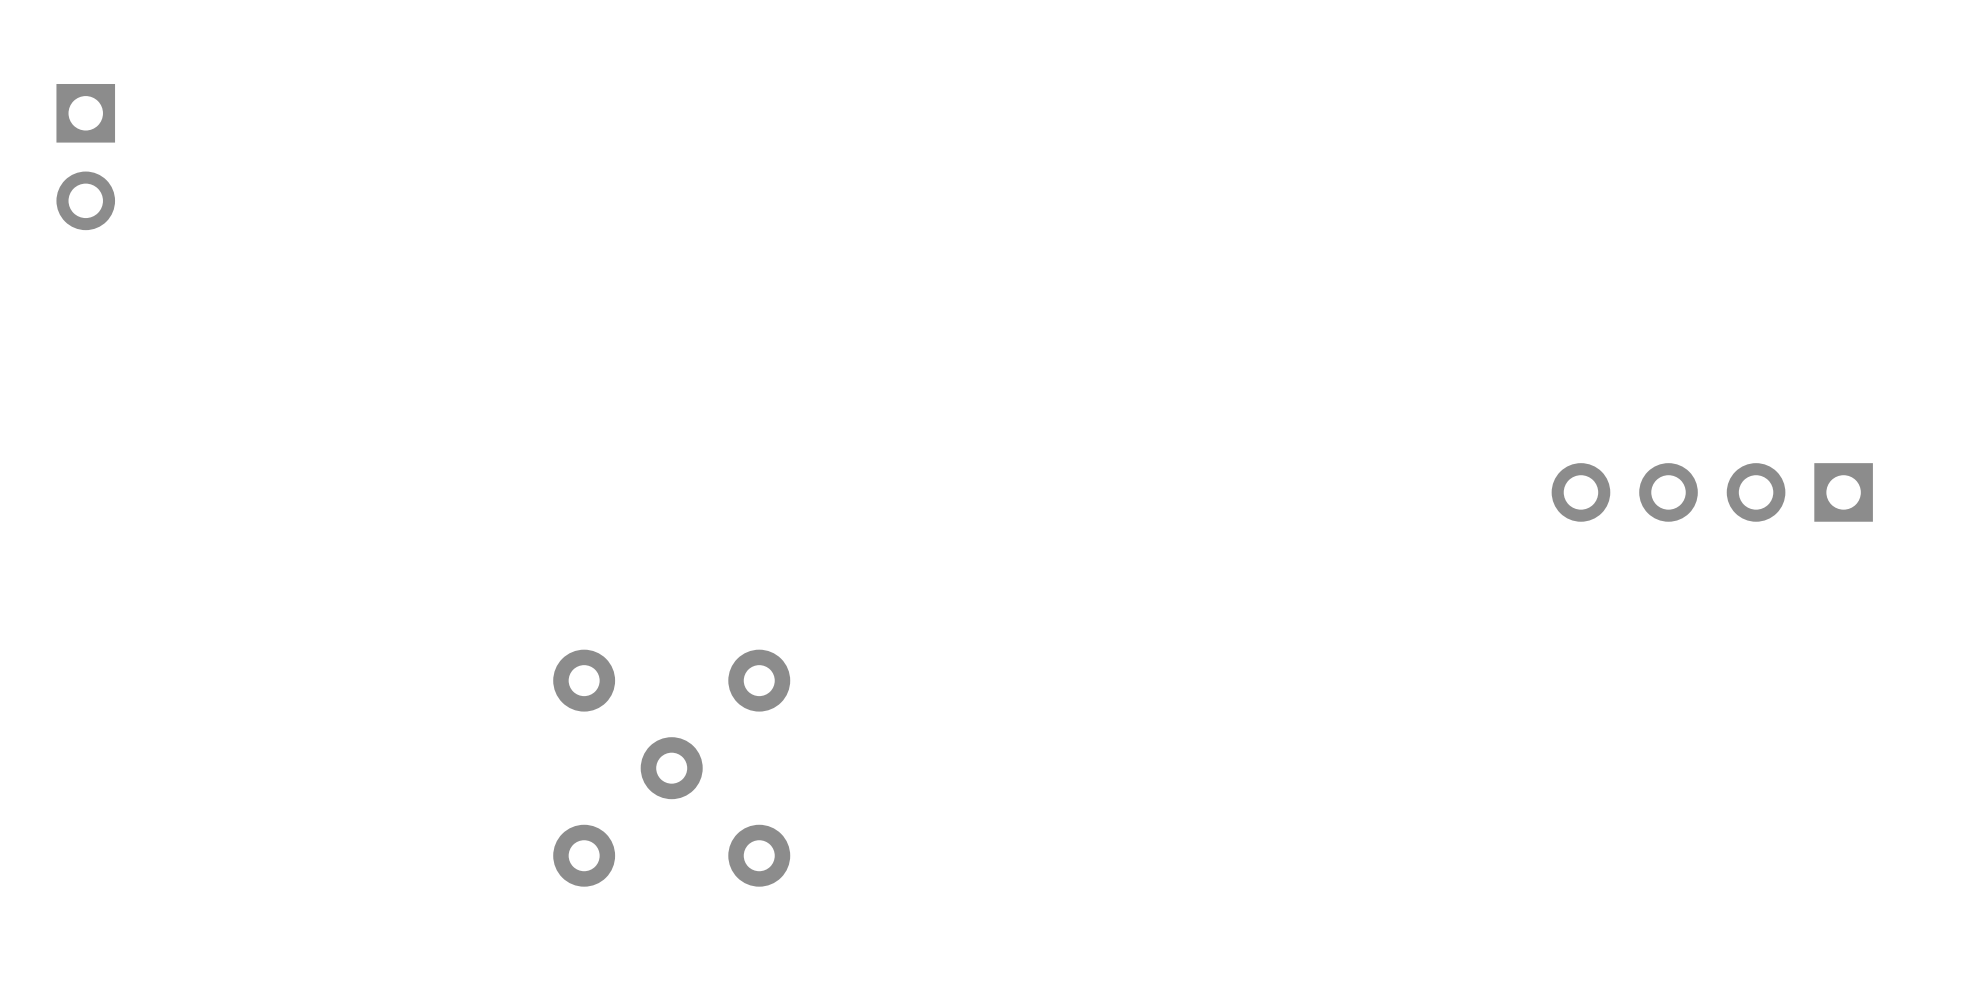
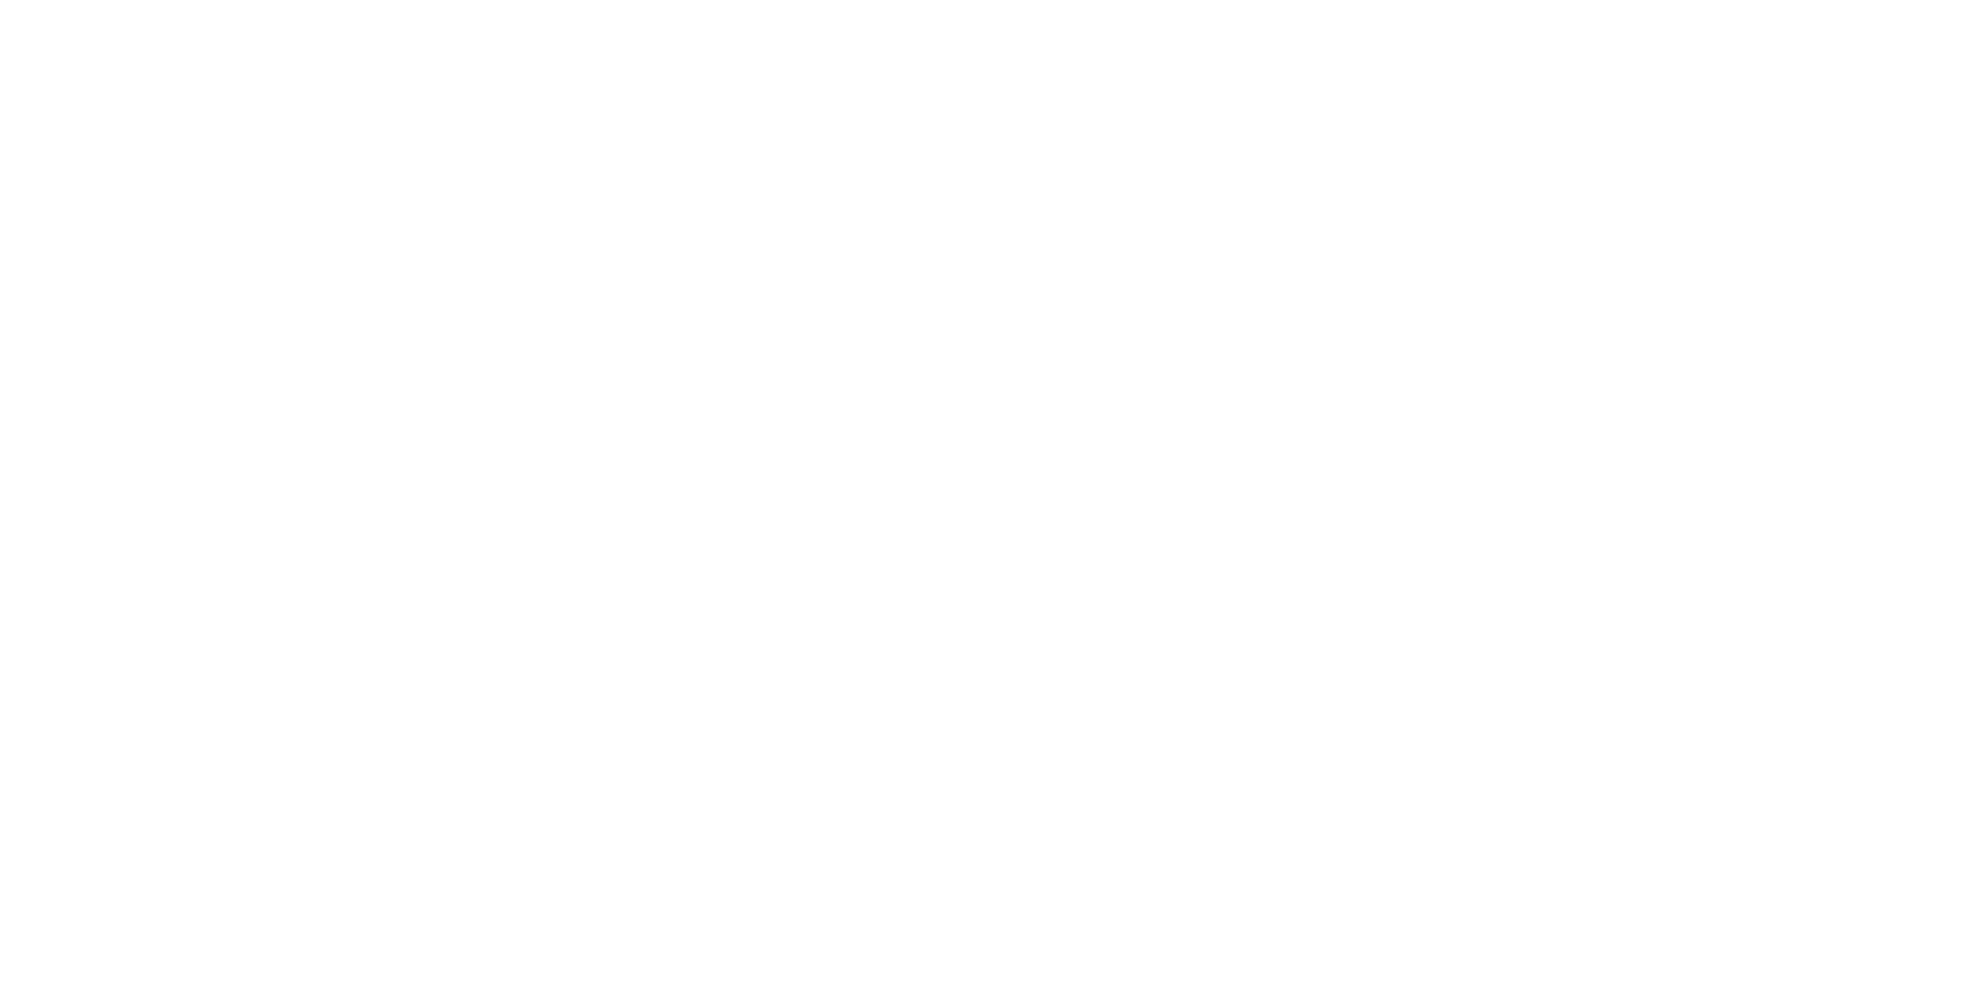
part: (85, 157) -> none
part: (1712, 492) -> none
part: (671, 768) -> none

